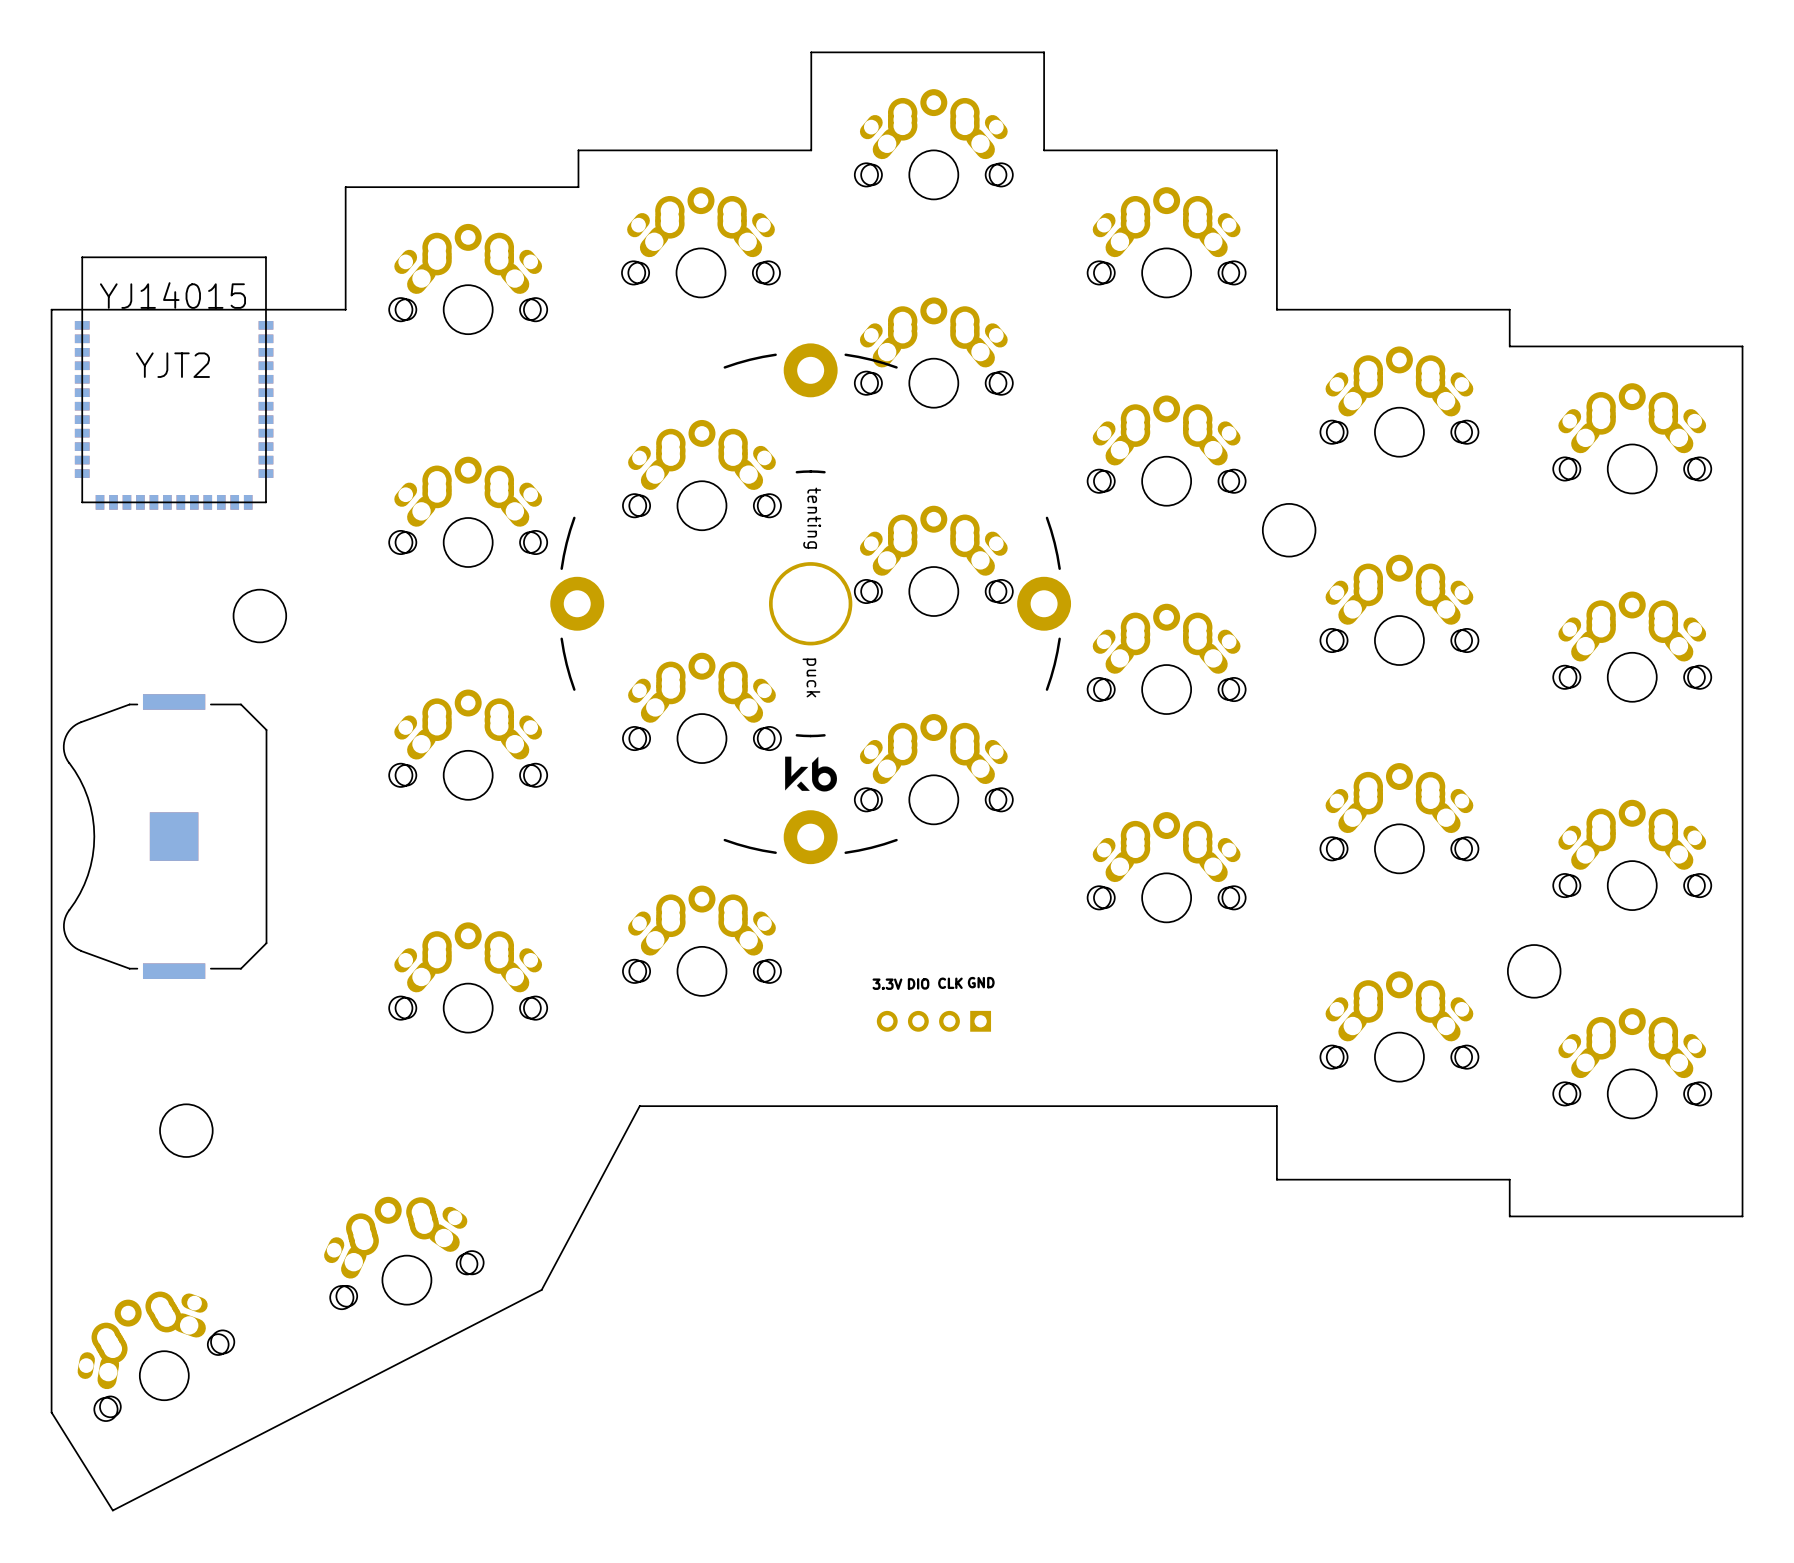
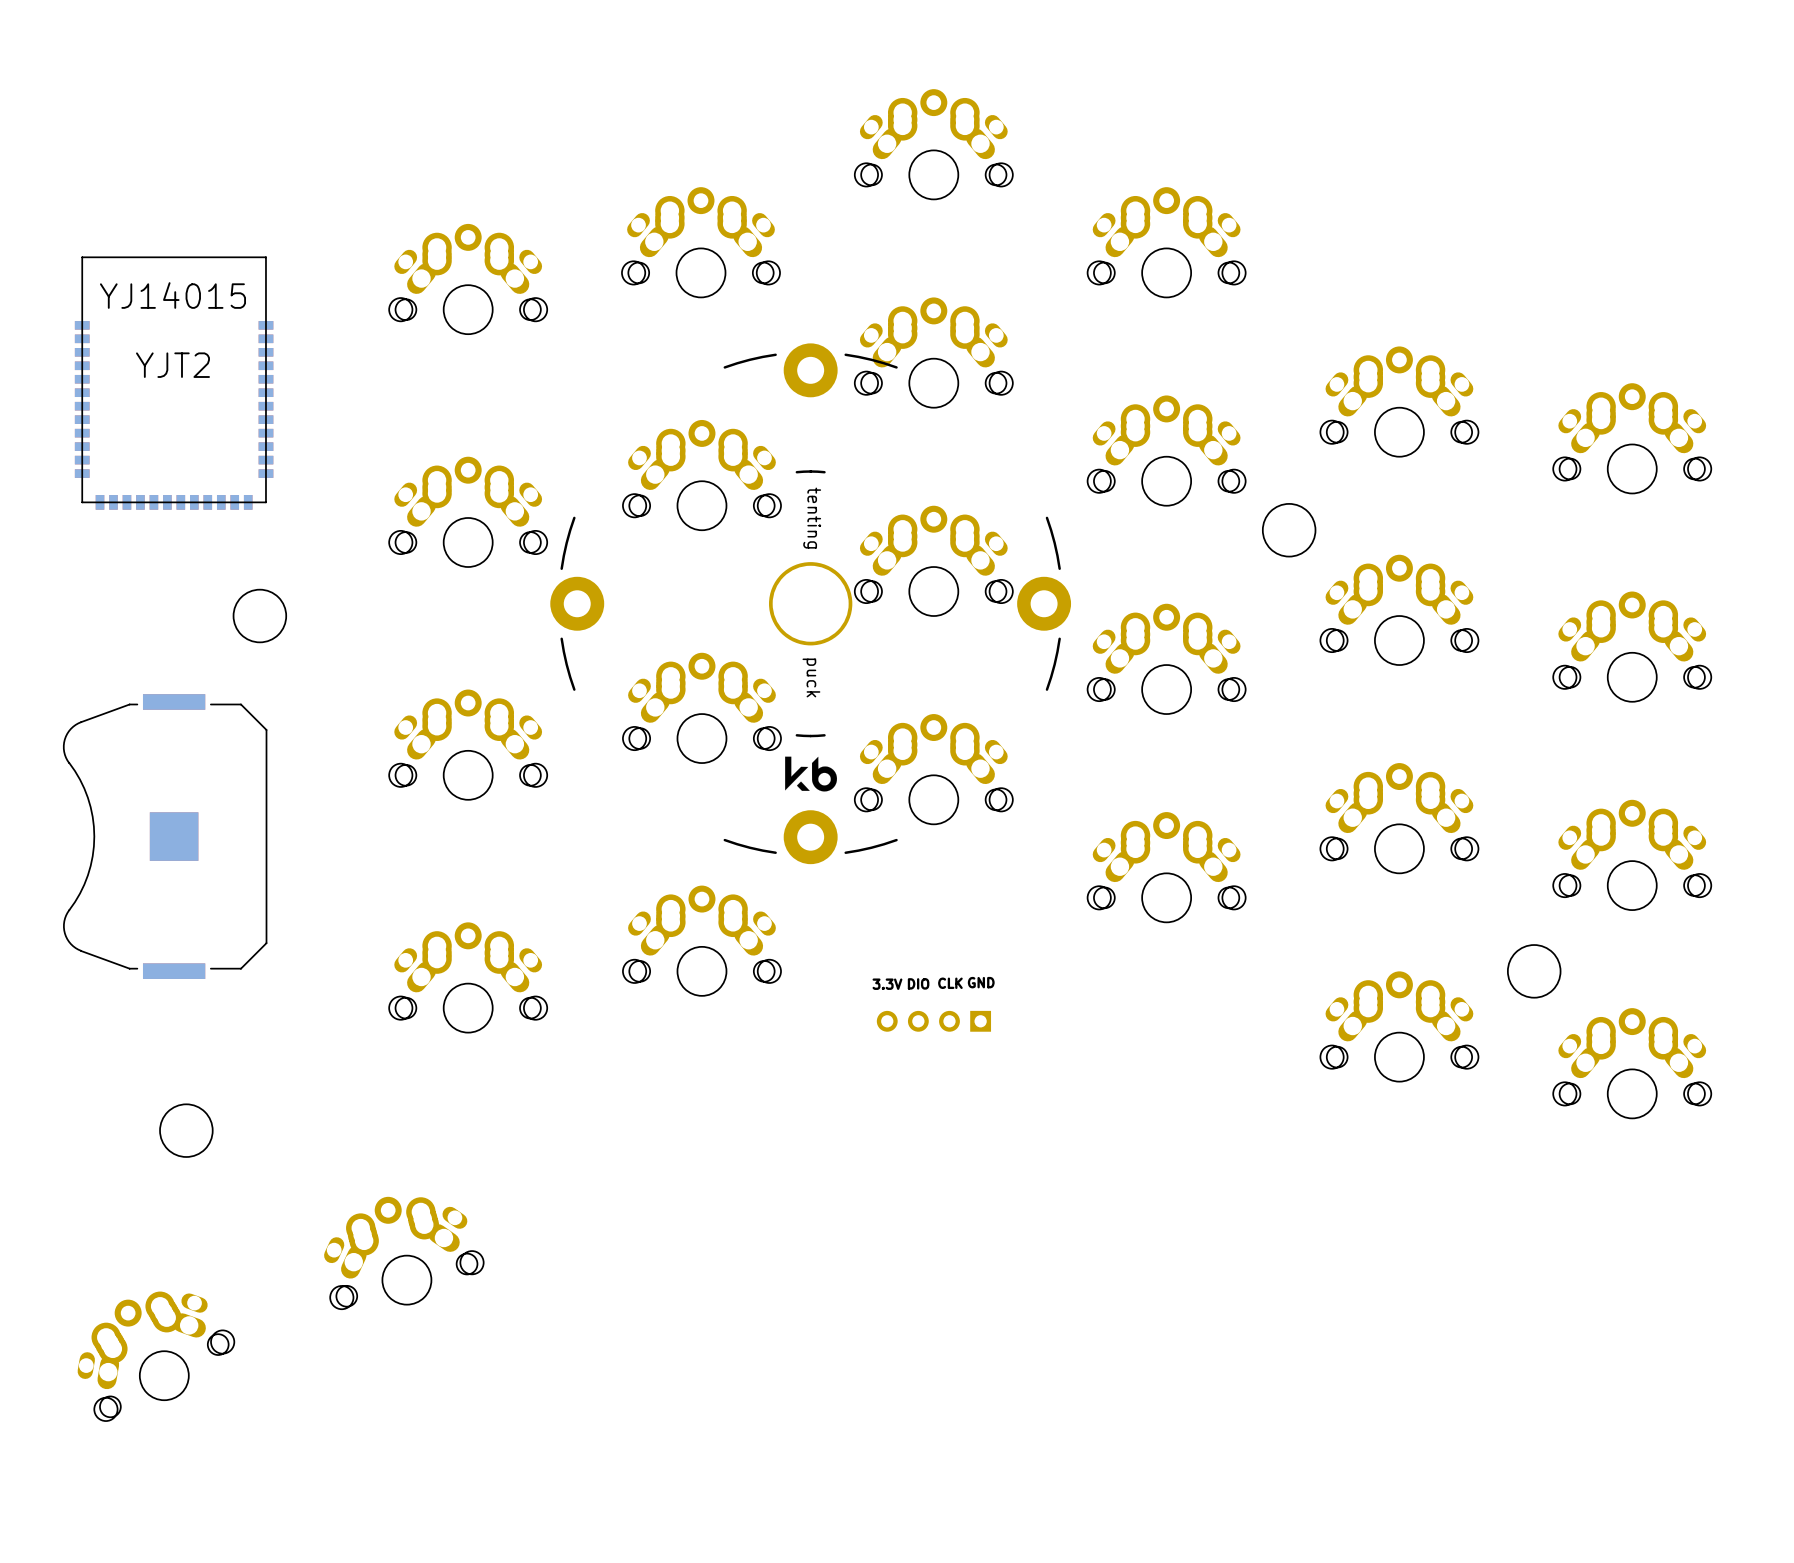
board edge: (1044, 52) (1044, 150) (1276, 150) (1276, 309) (1509, 309) (1509, 346) (1742, 346) (1742, 1216) (1509, 1216) (1509, 1179) (1276, 1179) (1276, 1106) (639, 1106) (541, 1289) (112, 1510) (51, 1412) (51, 309) (345, 309) (345, 187) (578, 187) (578, 150) (811, 150) (811, 52) (1044, 52) -> none

